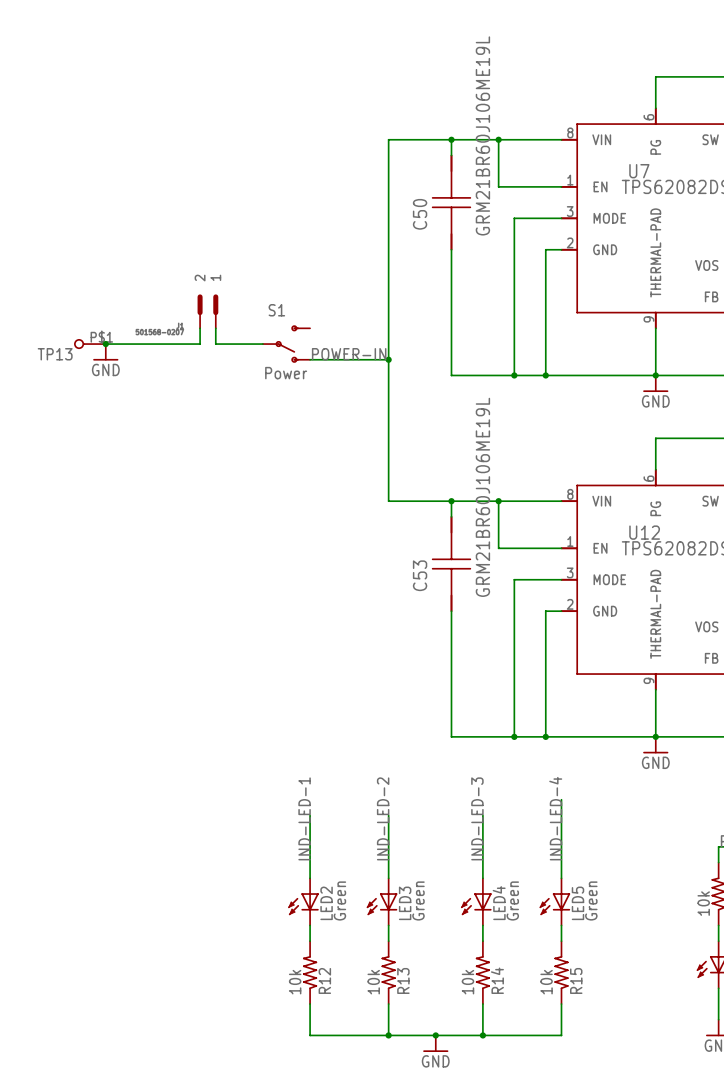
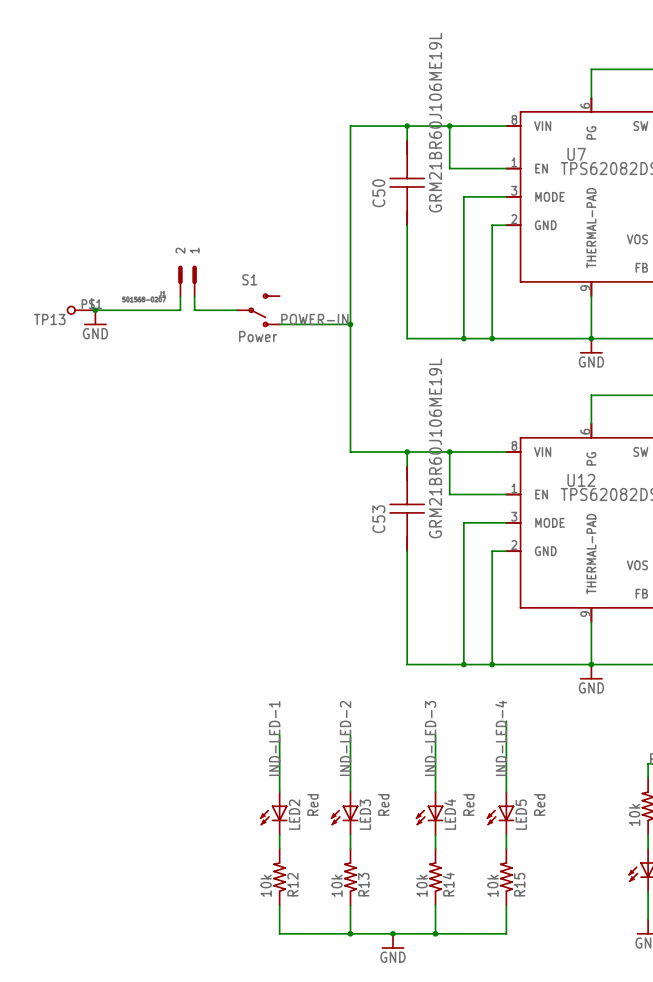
LED2 value: Green (339, 900) -> Red (312, 804)
LED3 value: Green (418, 900) -> Red (383, 804)
LED4 value: Green (512, 900) -> Red (468, 804)
LED5 value: Green (591, 900) -> Red (539, 804)

